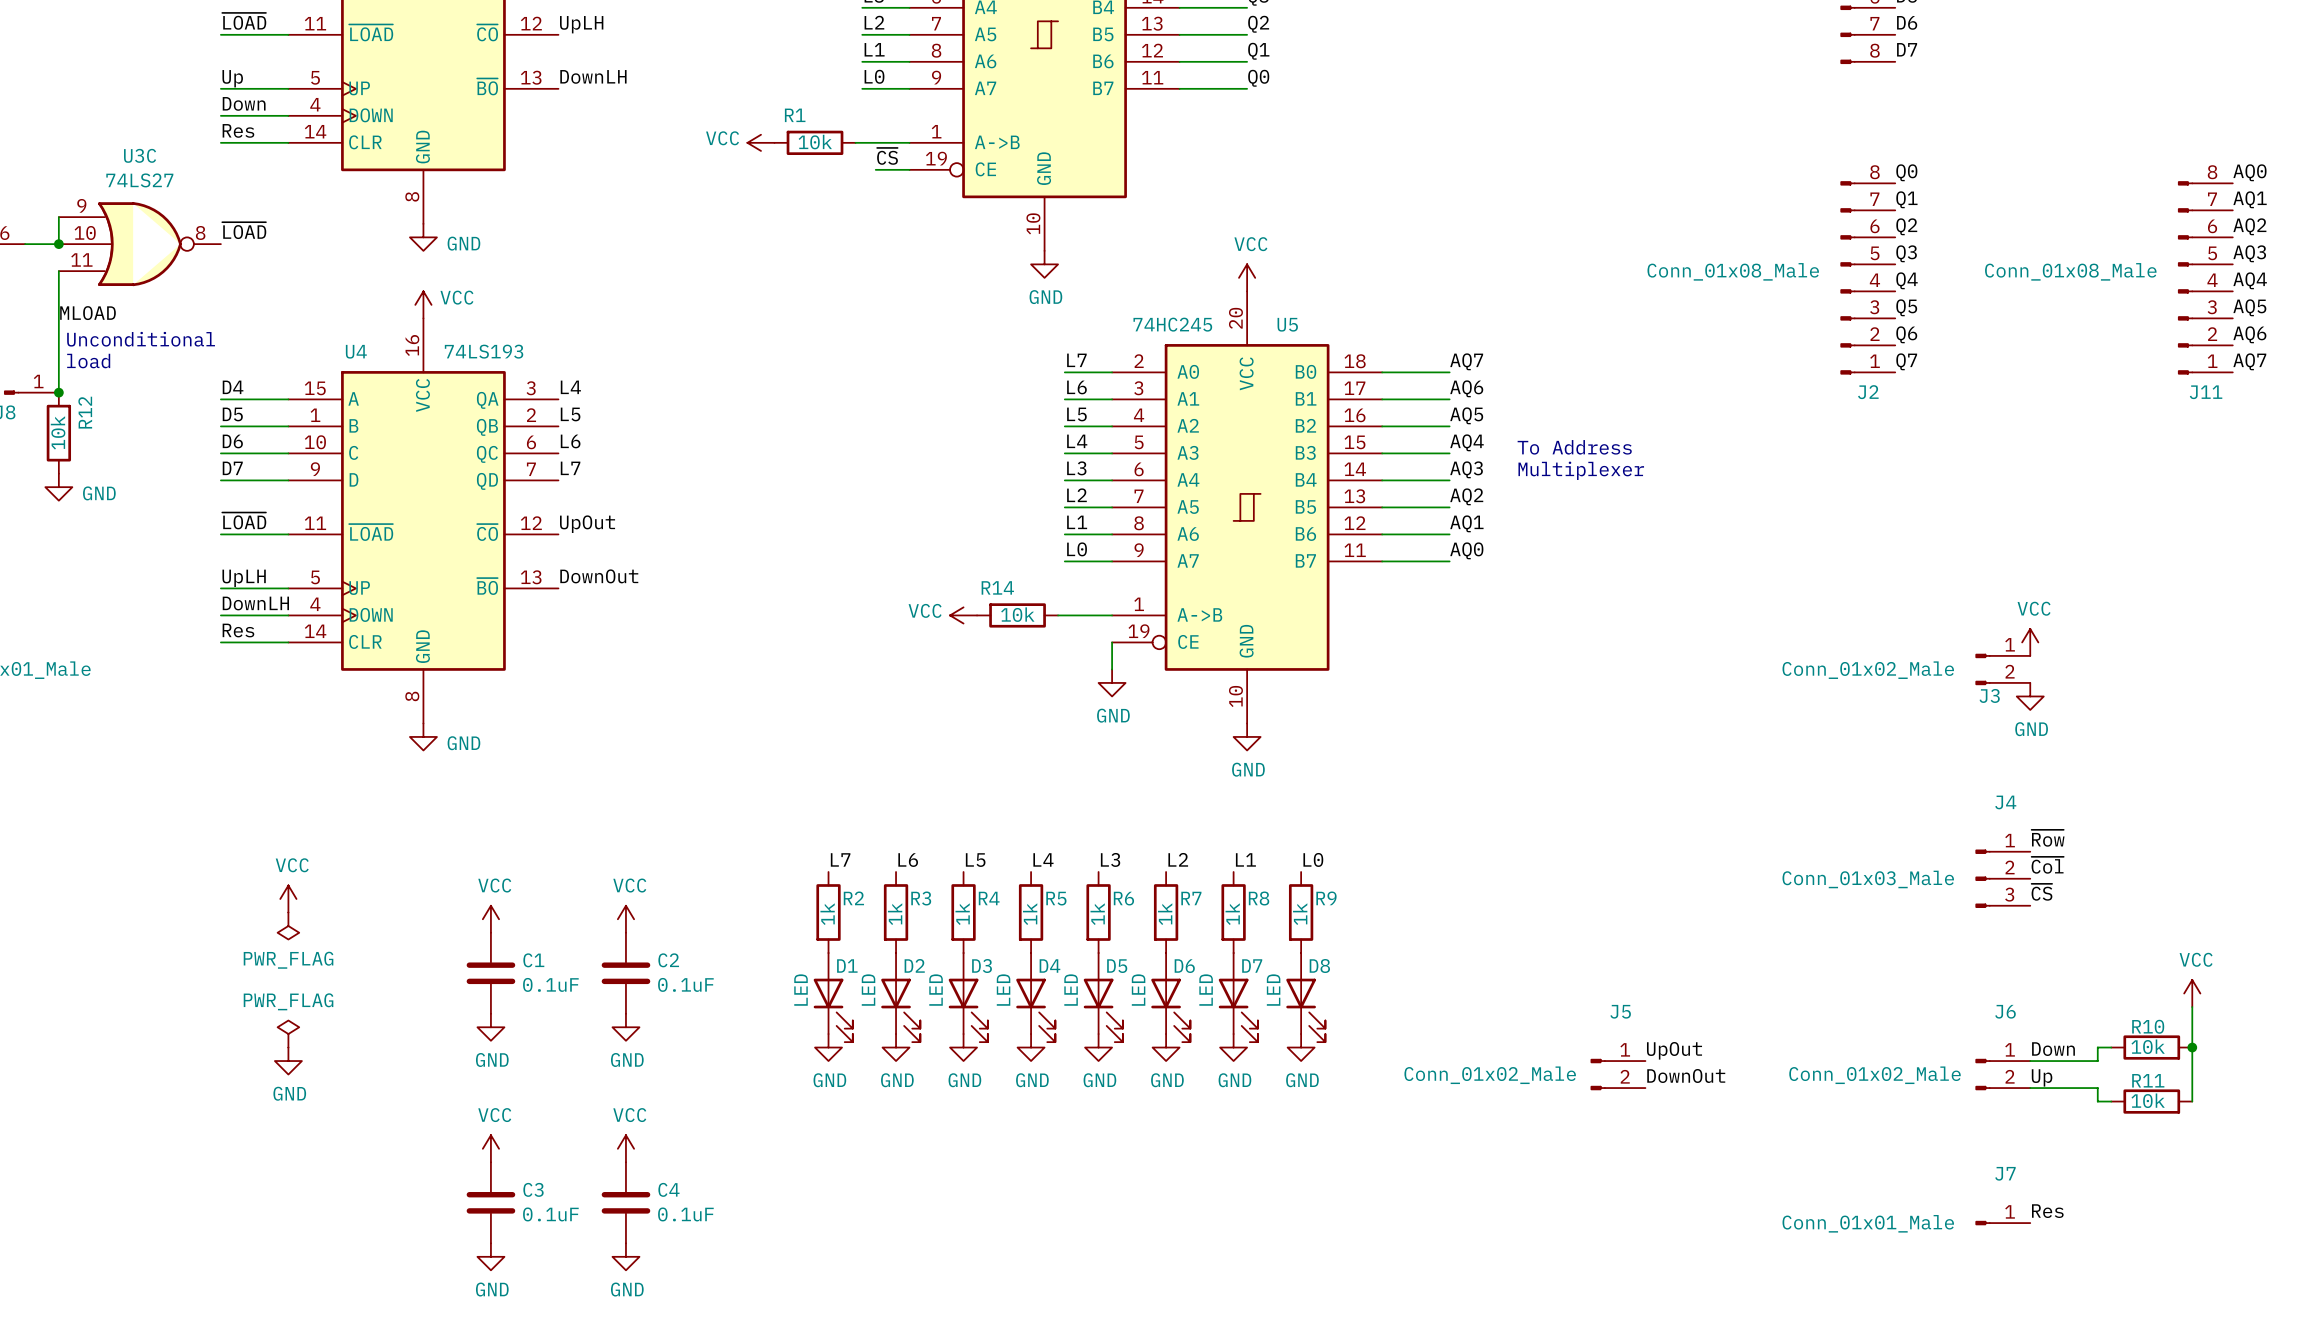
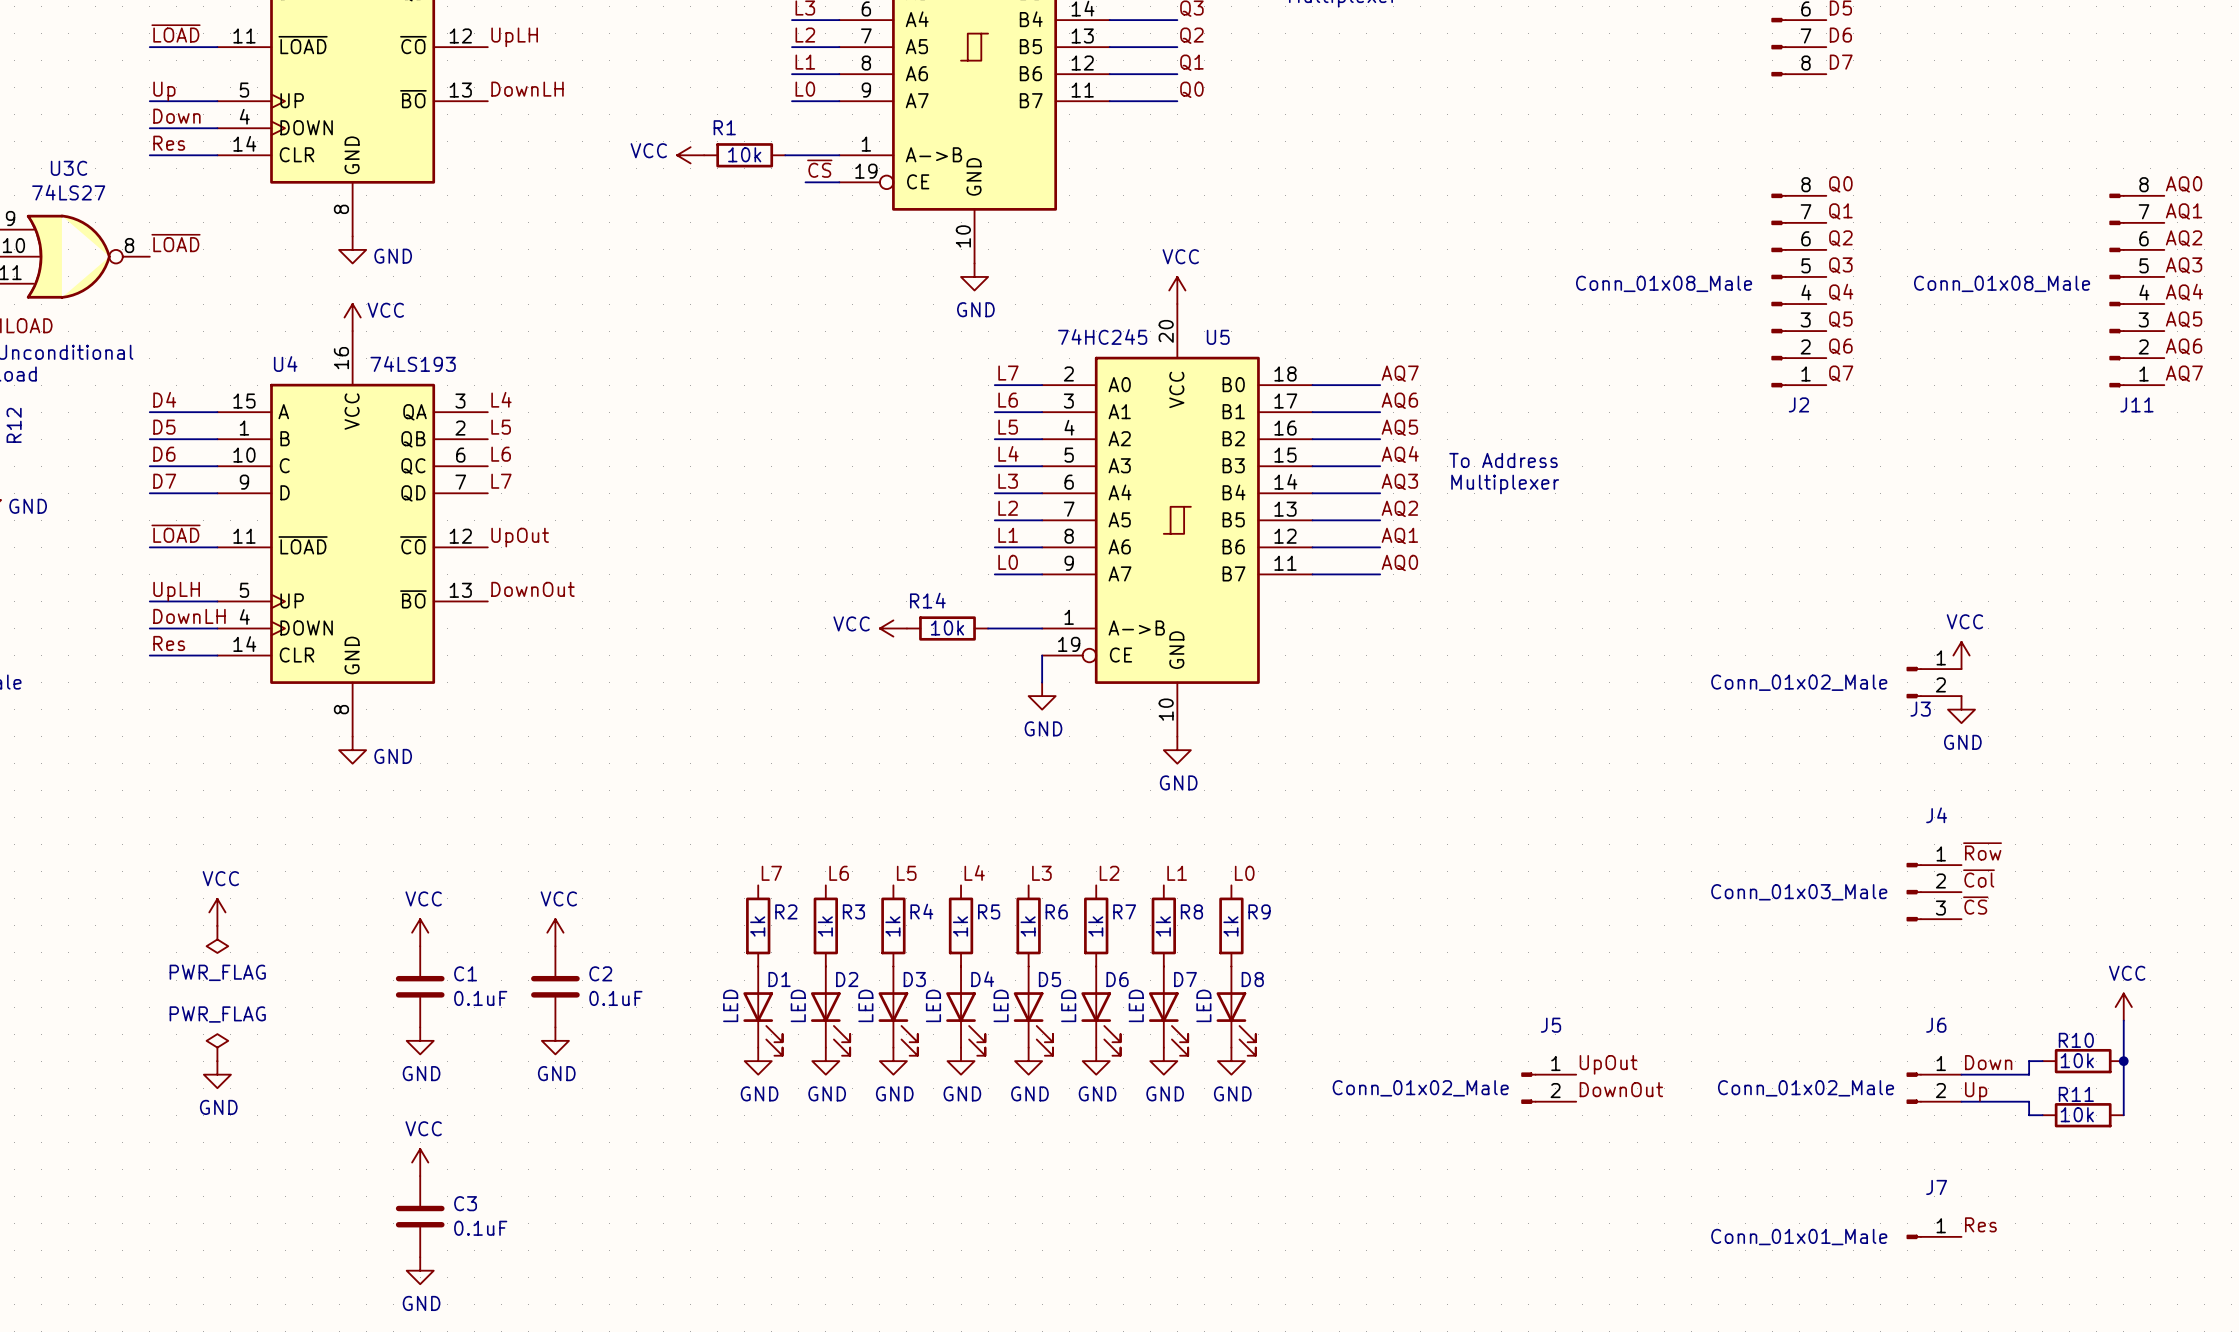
power symbol: VCC (625, 1148) -> none
C4: 0.1uF (625, 1202) -> none
power symbol: GND (625, 1256) -> none

